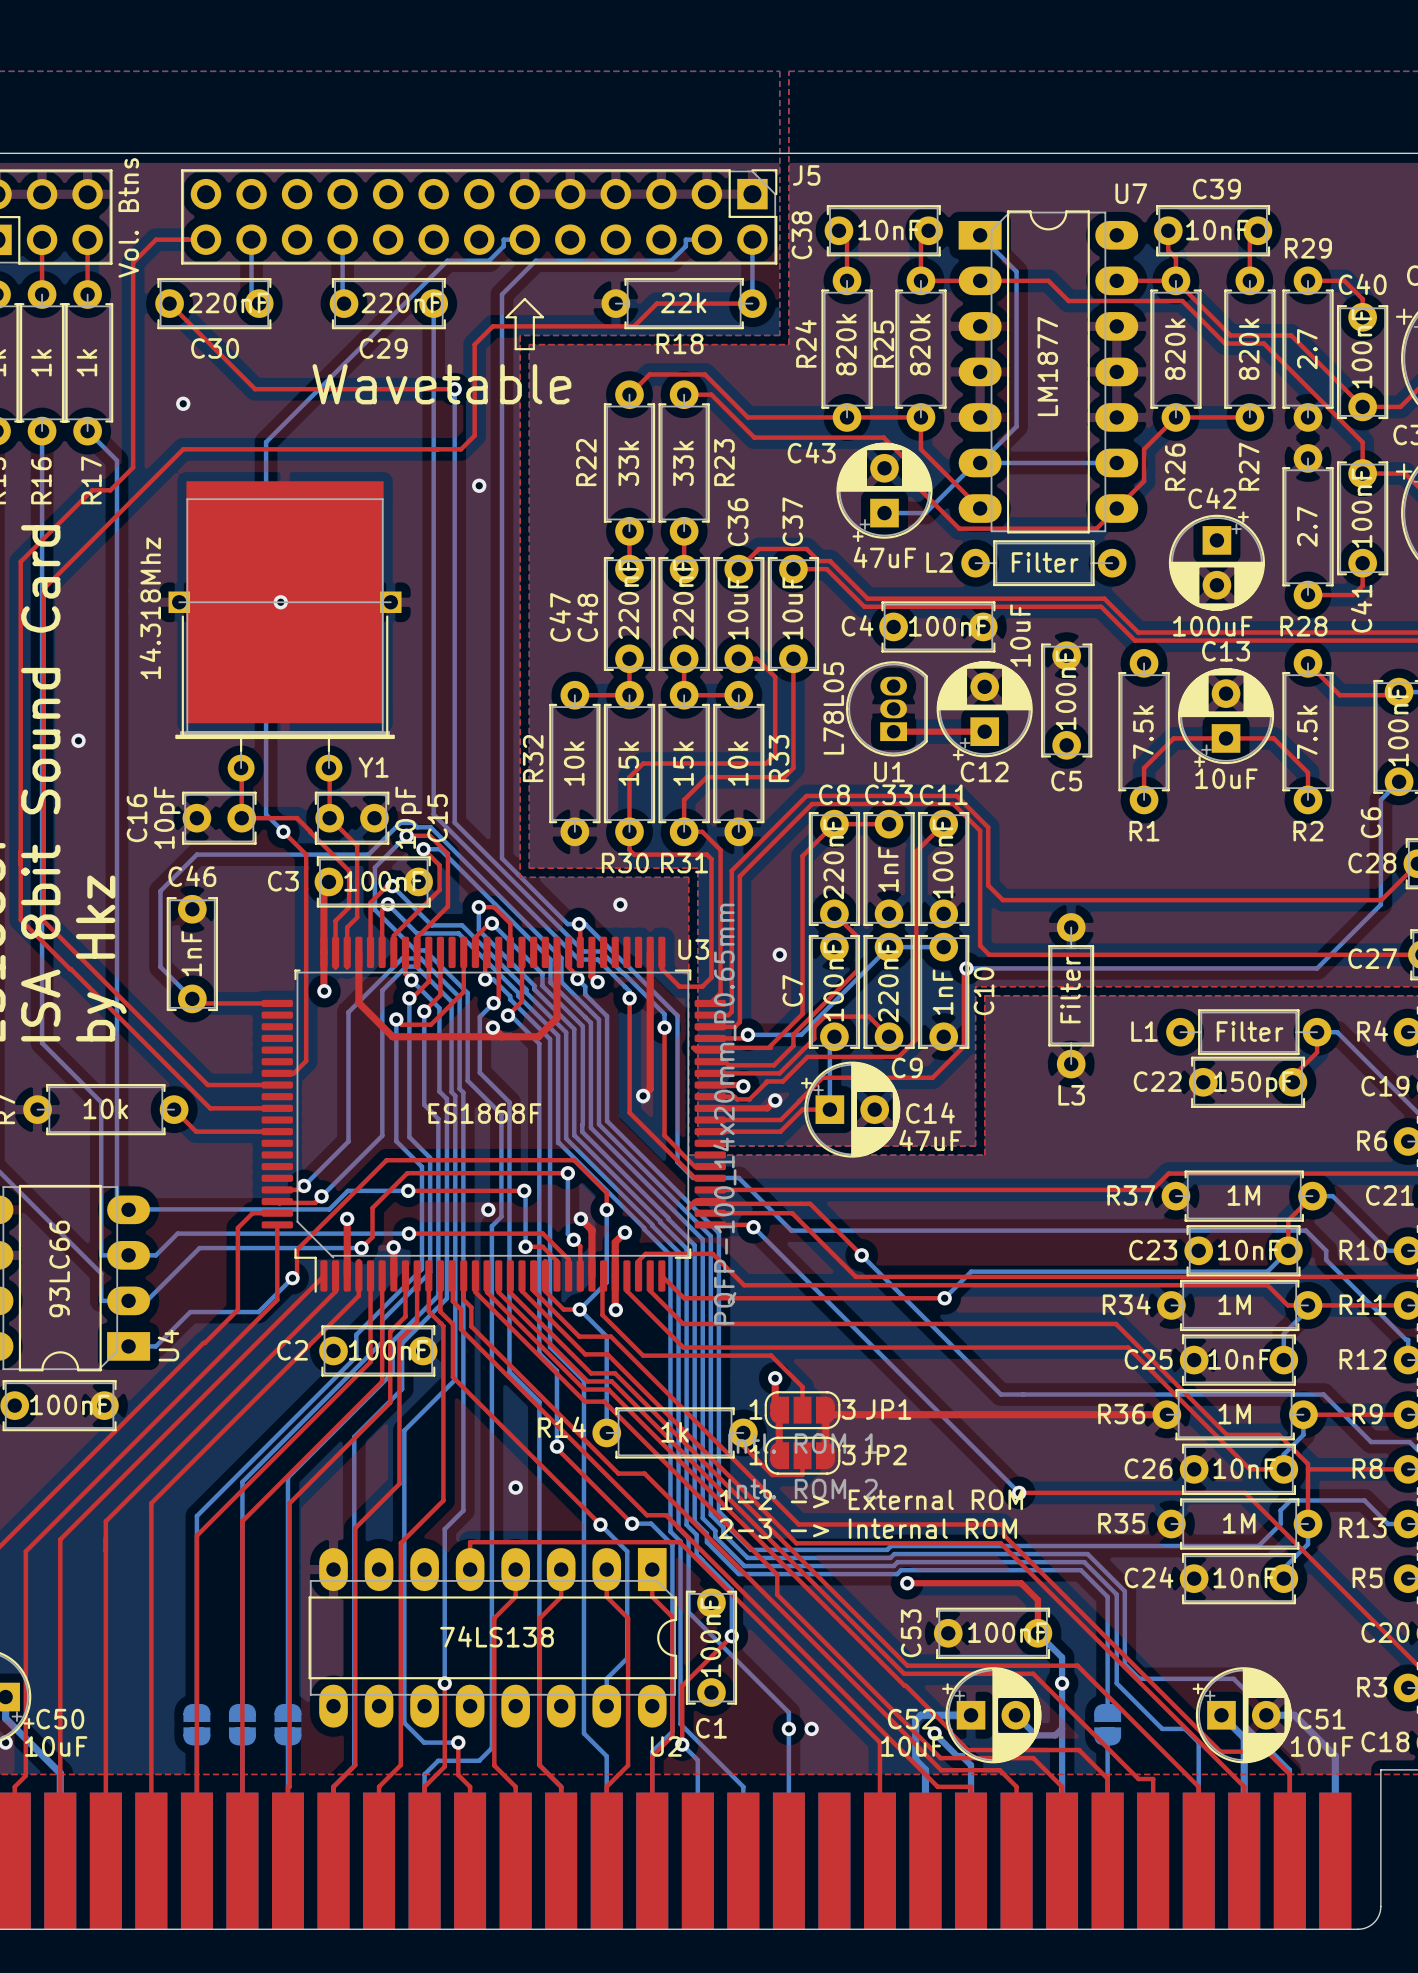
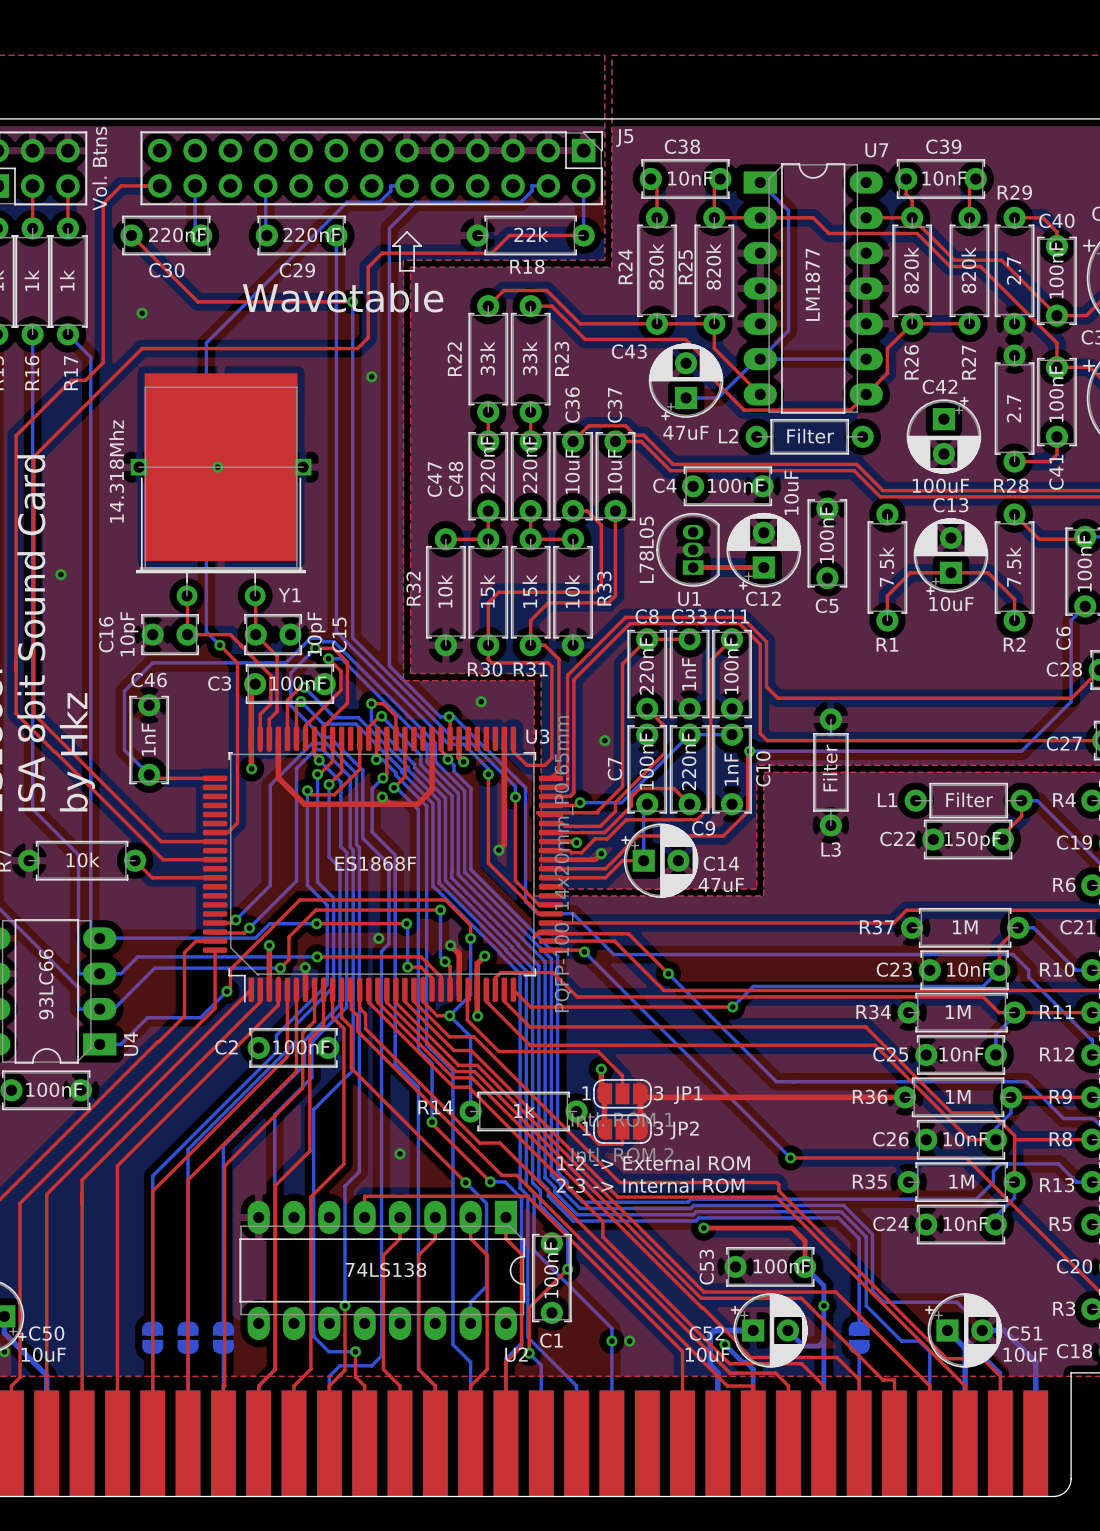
C38 name rotation: 0° (801, 235) -> 90° clockwise (682, 146)
C38 name position: C38 (801, 235) -> C38 (682, 146)

